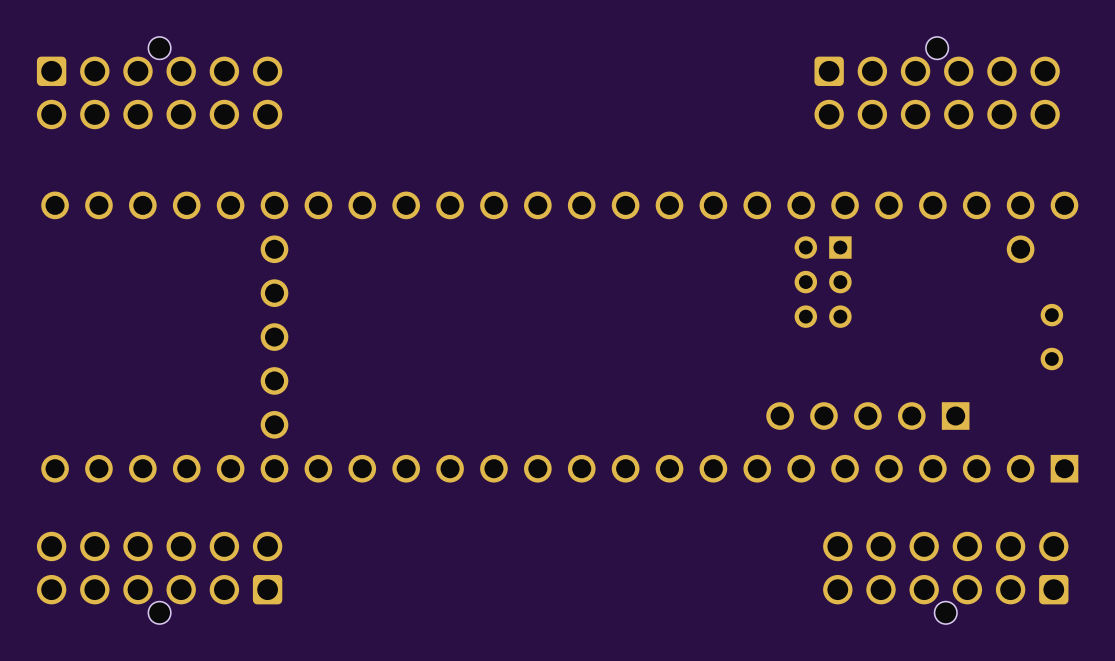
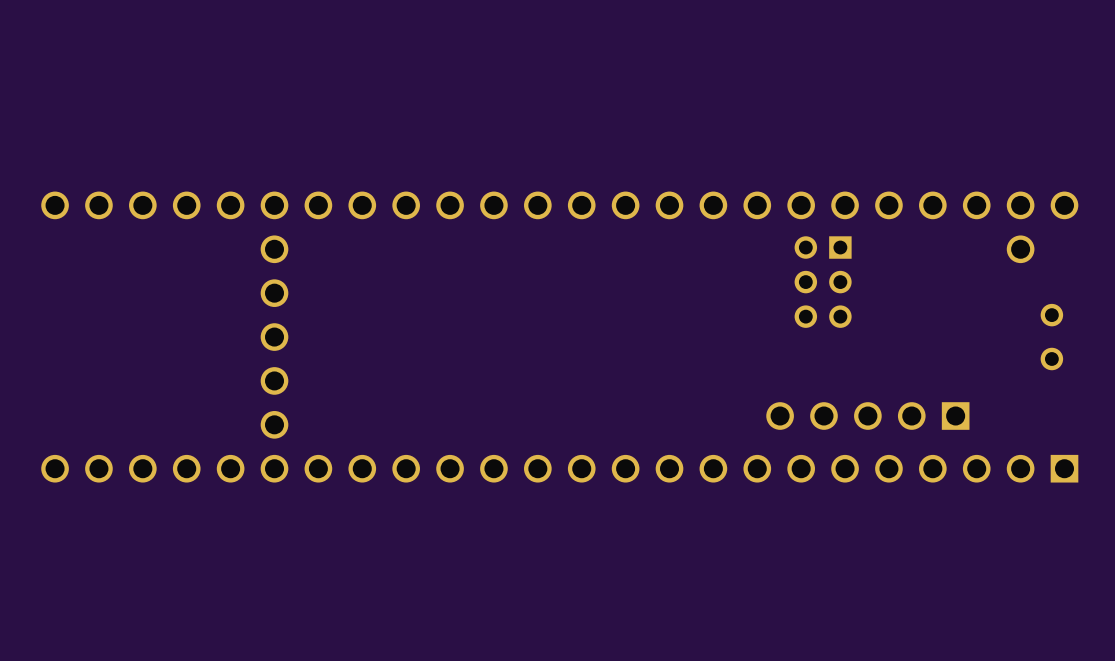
part: (159, 83) -> none
part: (937, 83) -> none
part: (159, 577) -> none
part: (945, 577) -> none

